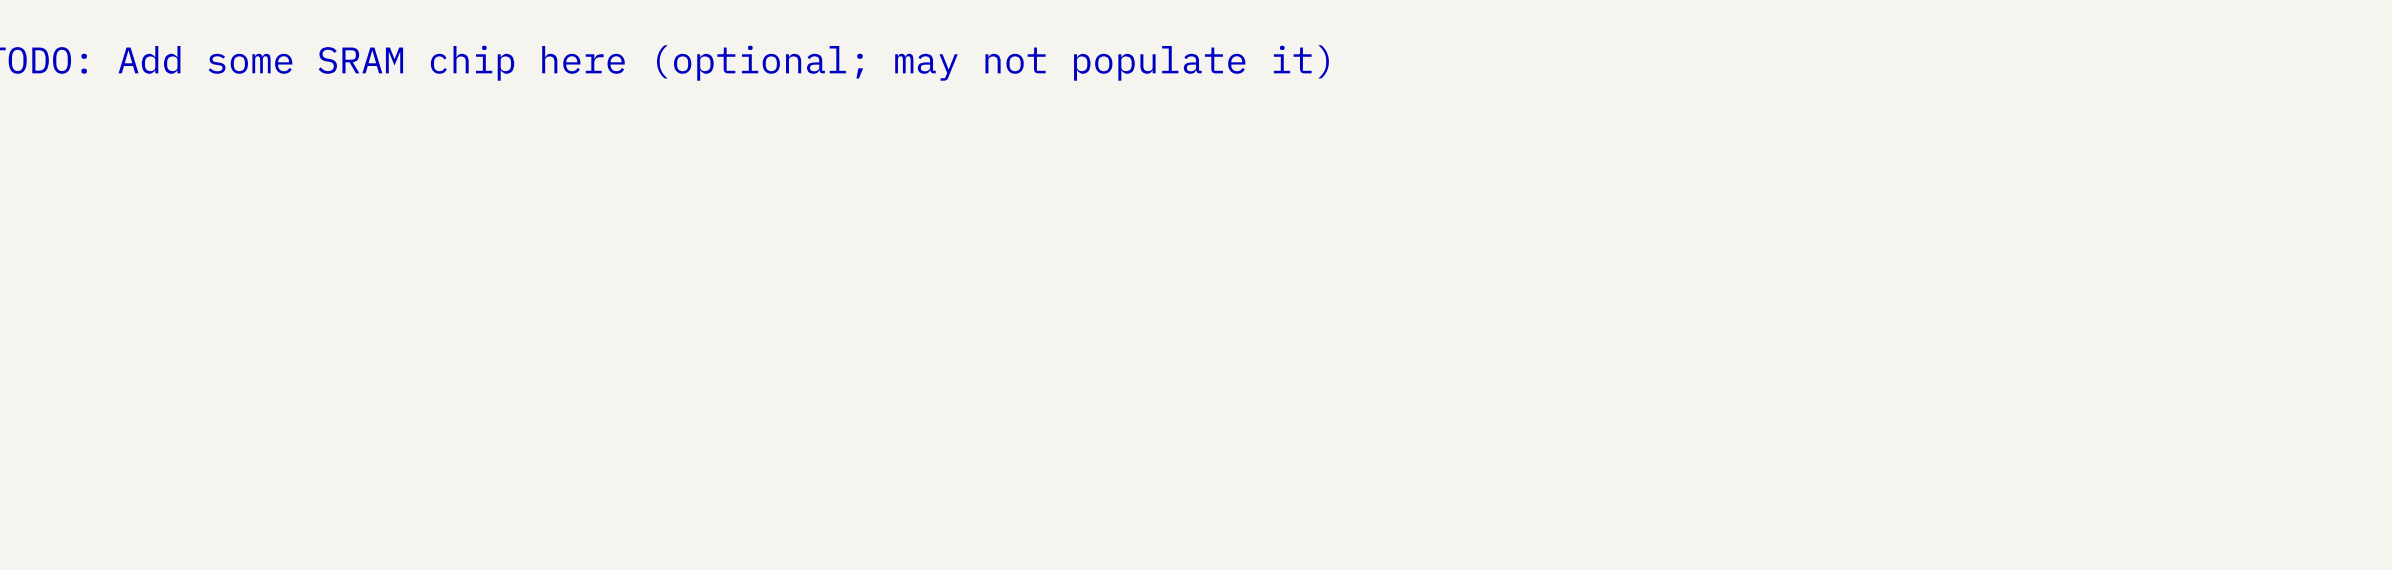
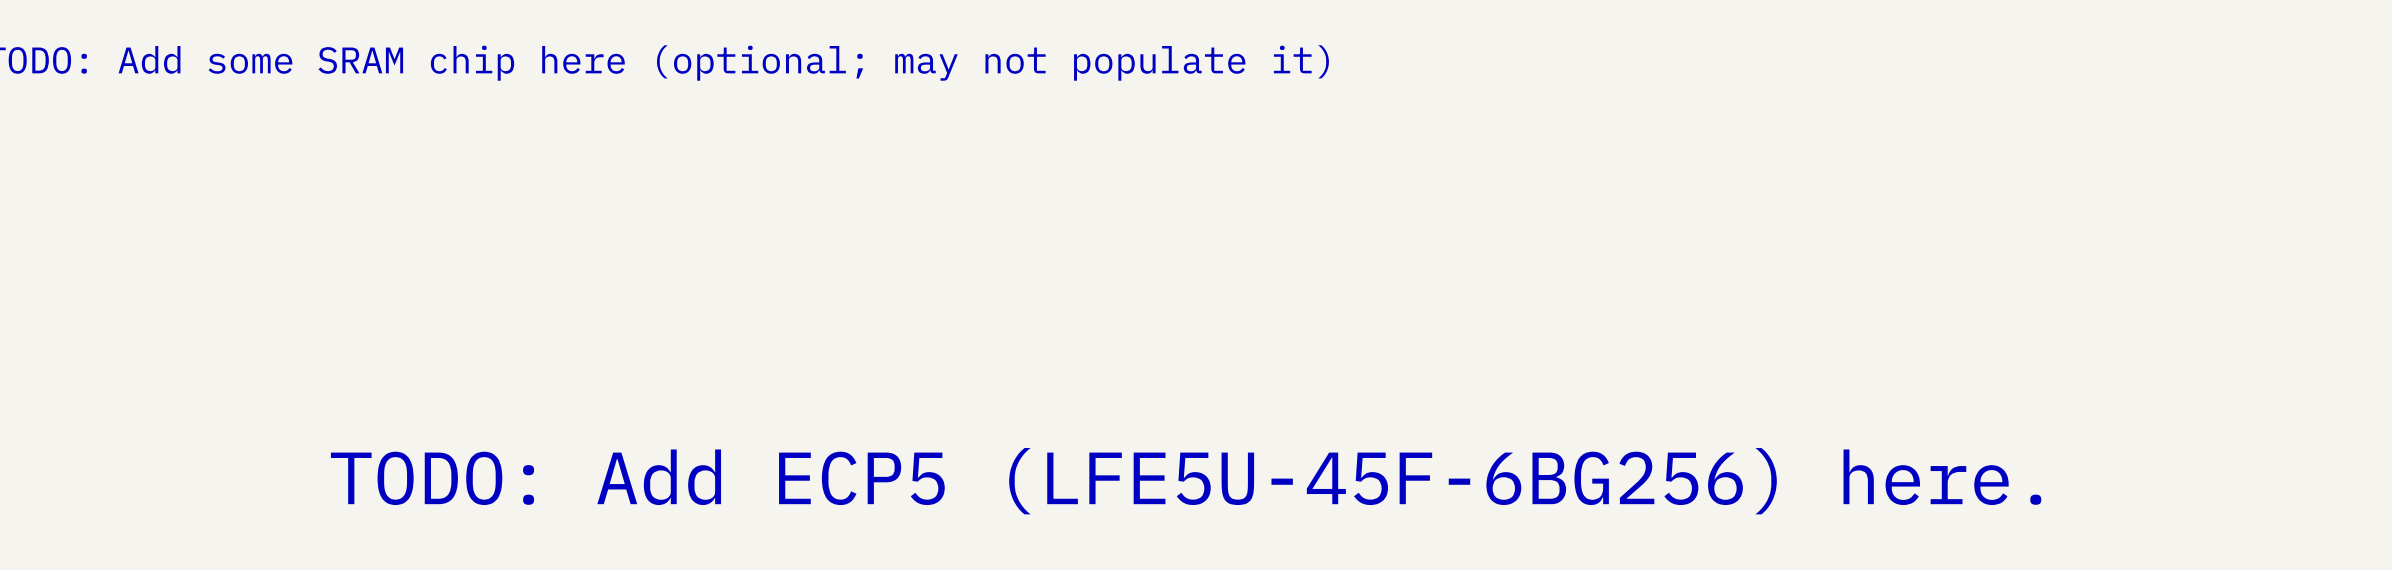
text: none -> TODO: Add ECP5 (LFE5U-45F-6BG256) here. (1186, 481)

